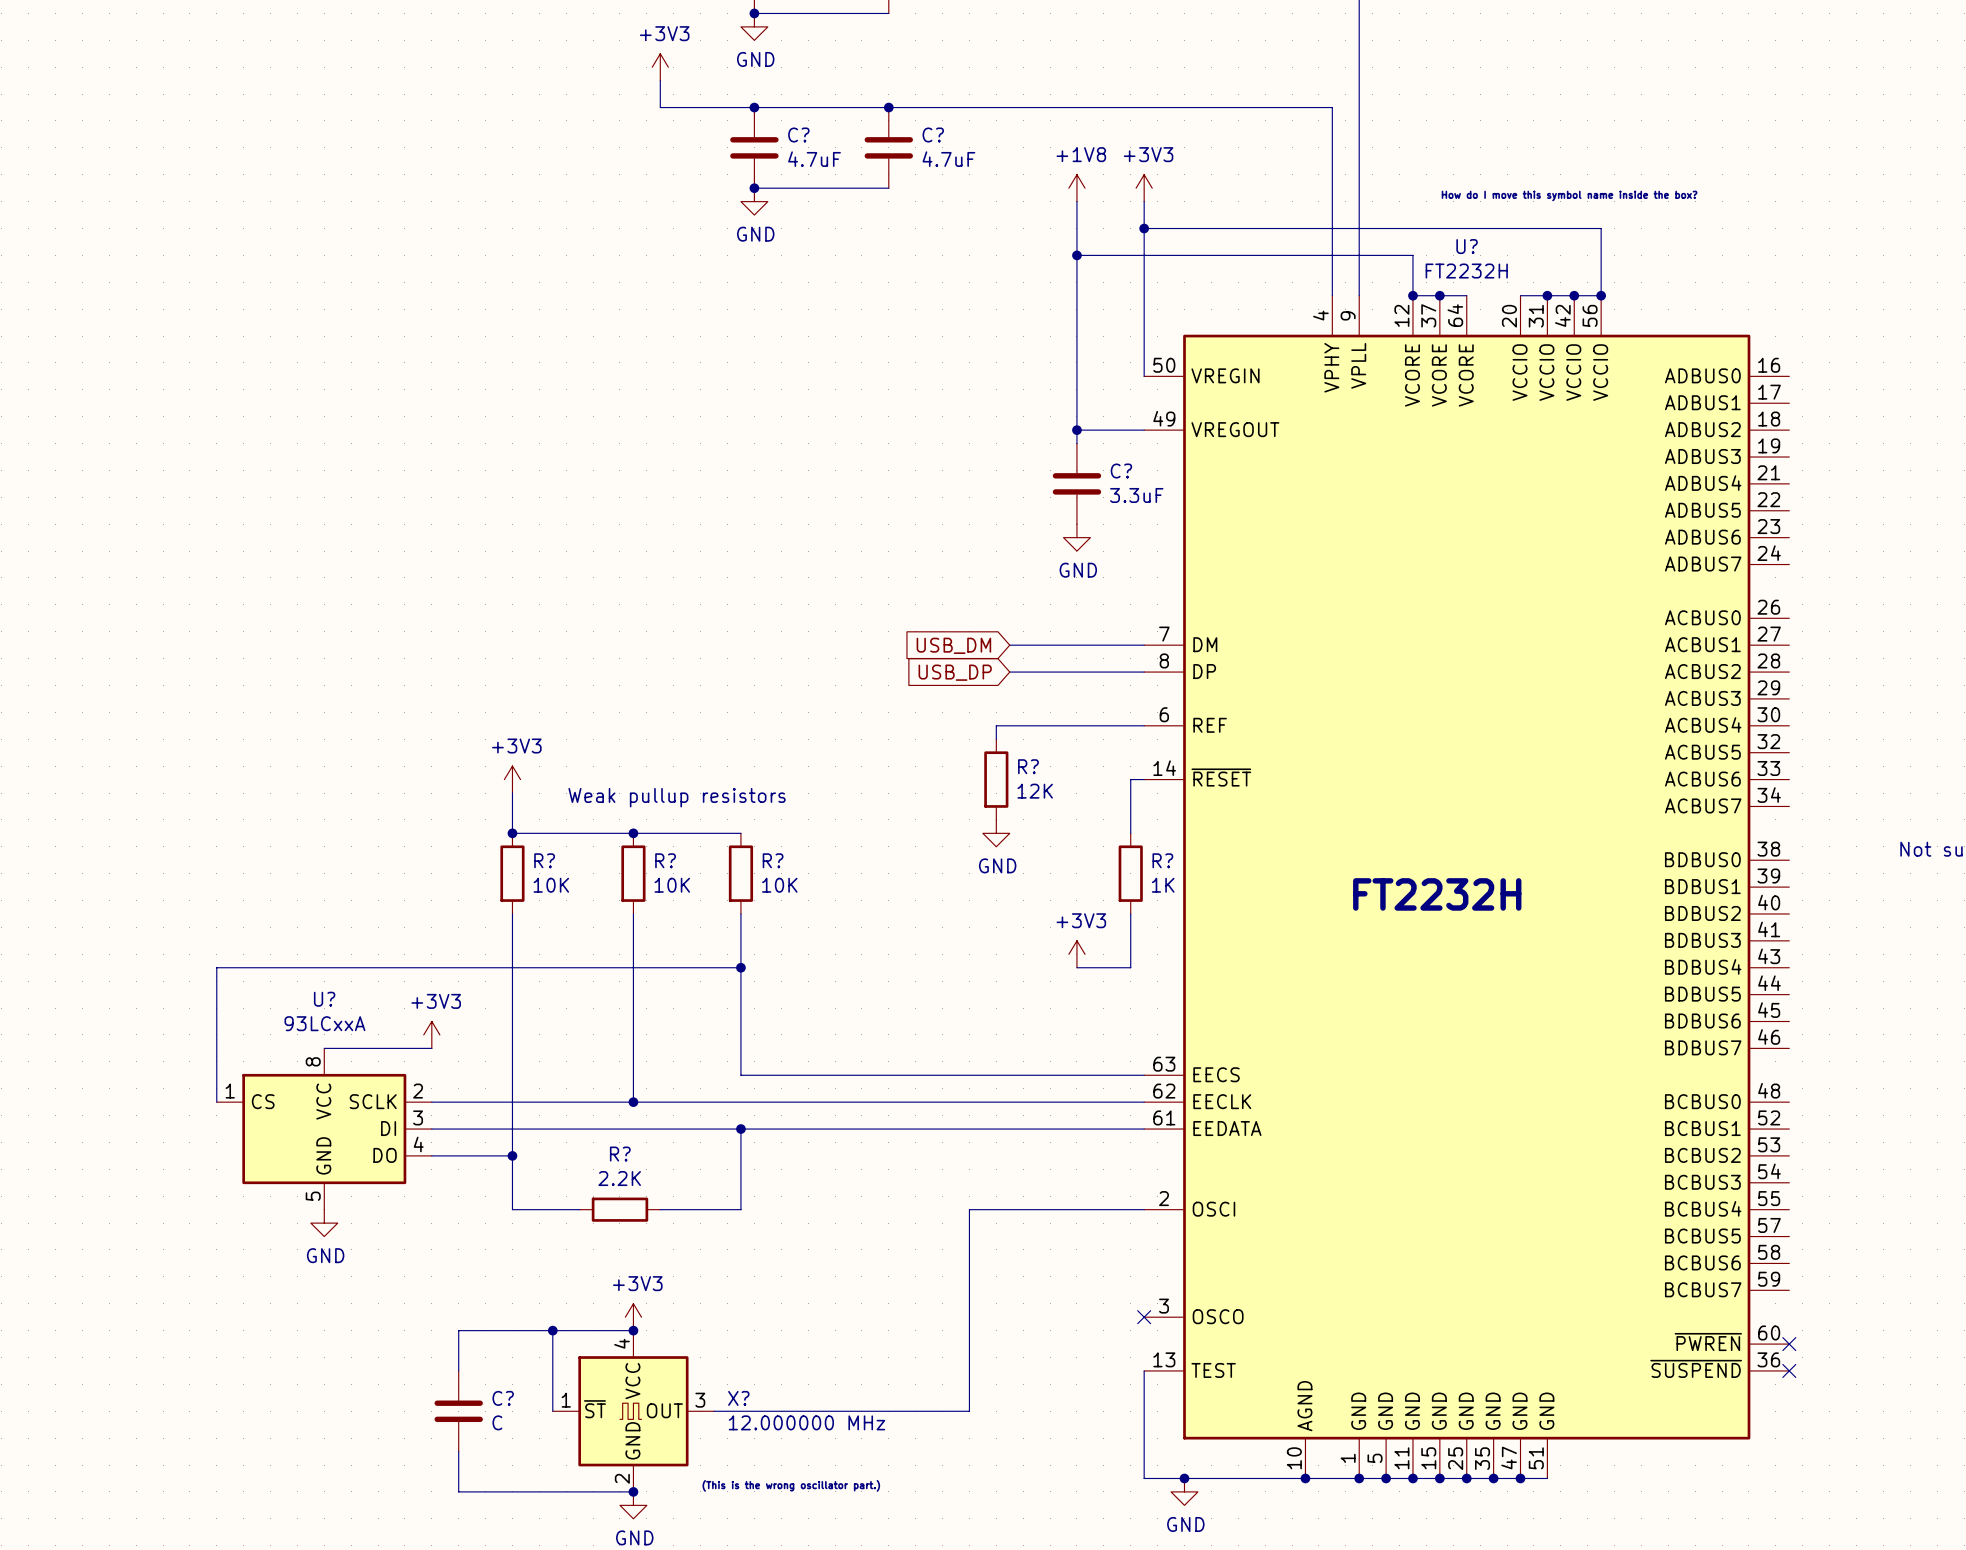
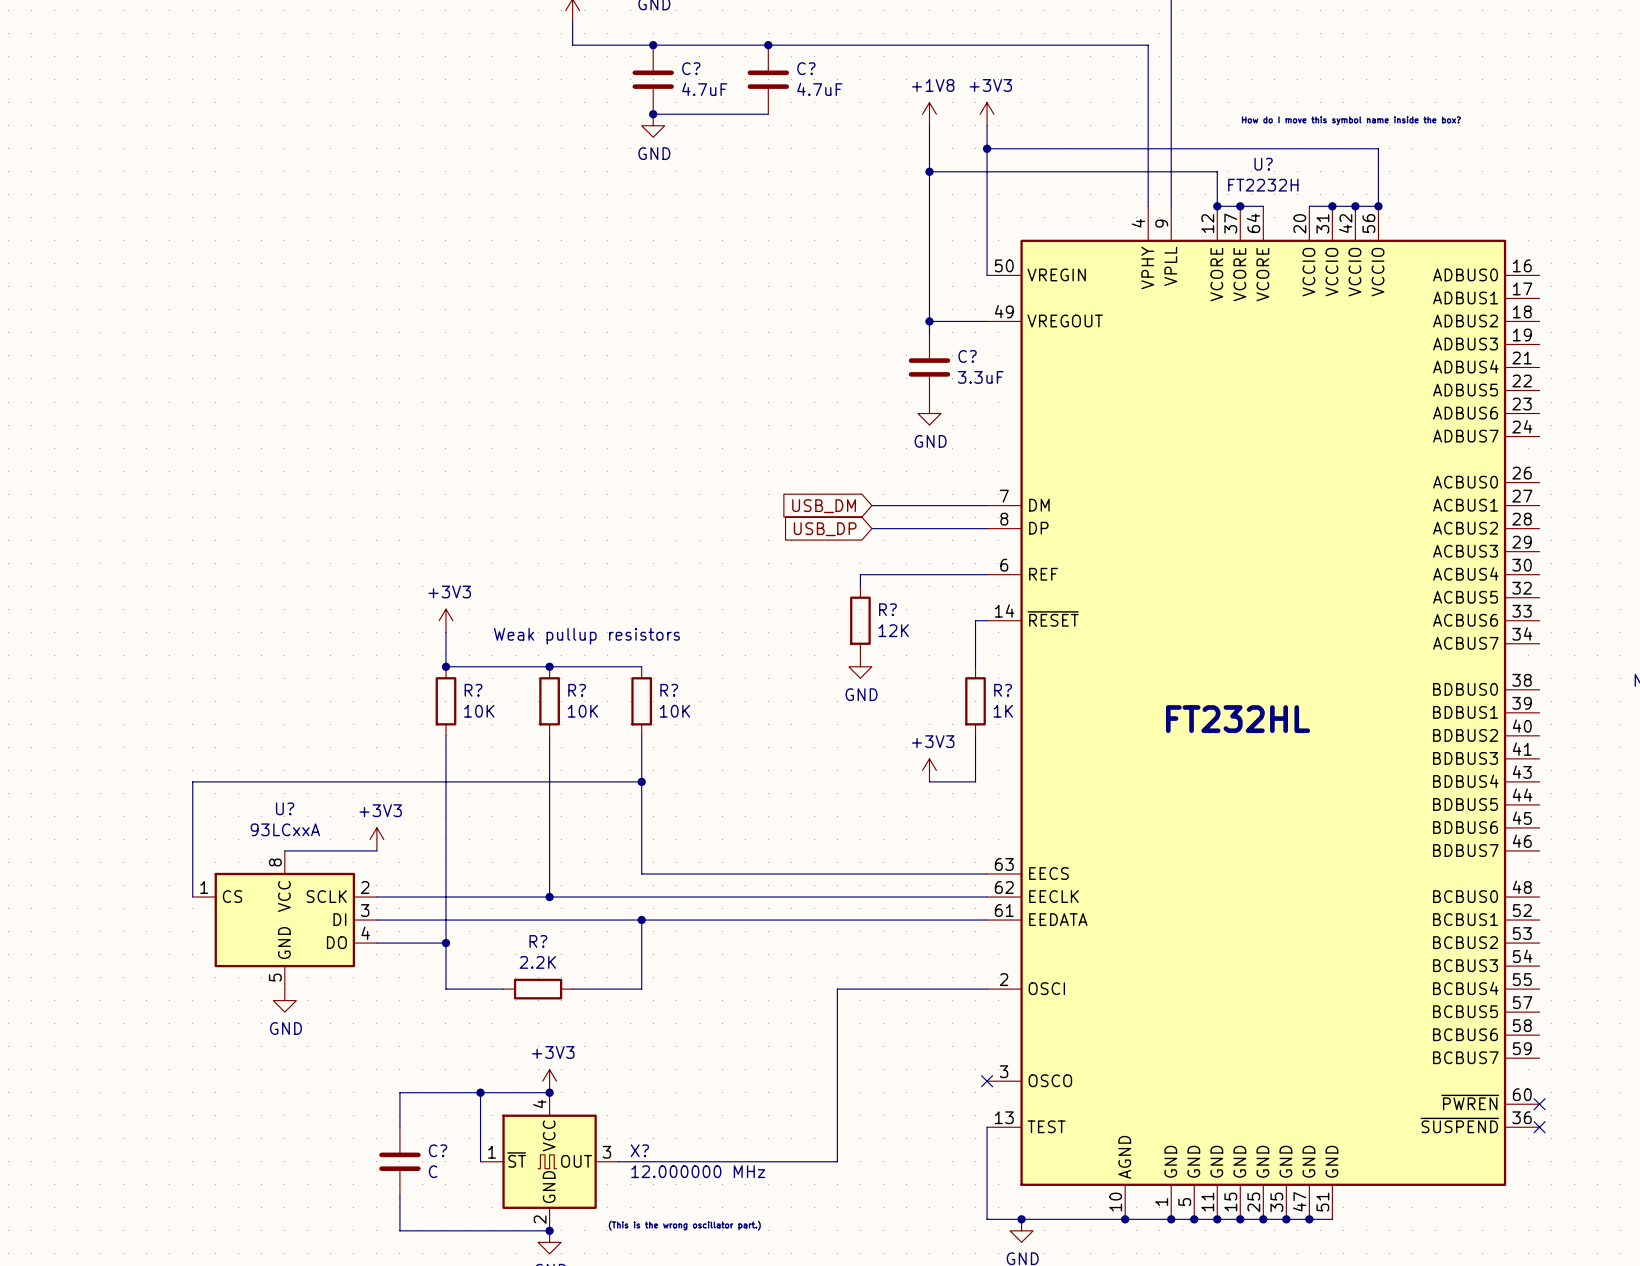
text: FT2232H (1437, 894) -> FT232HL (1238, 719)

